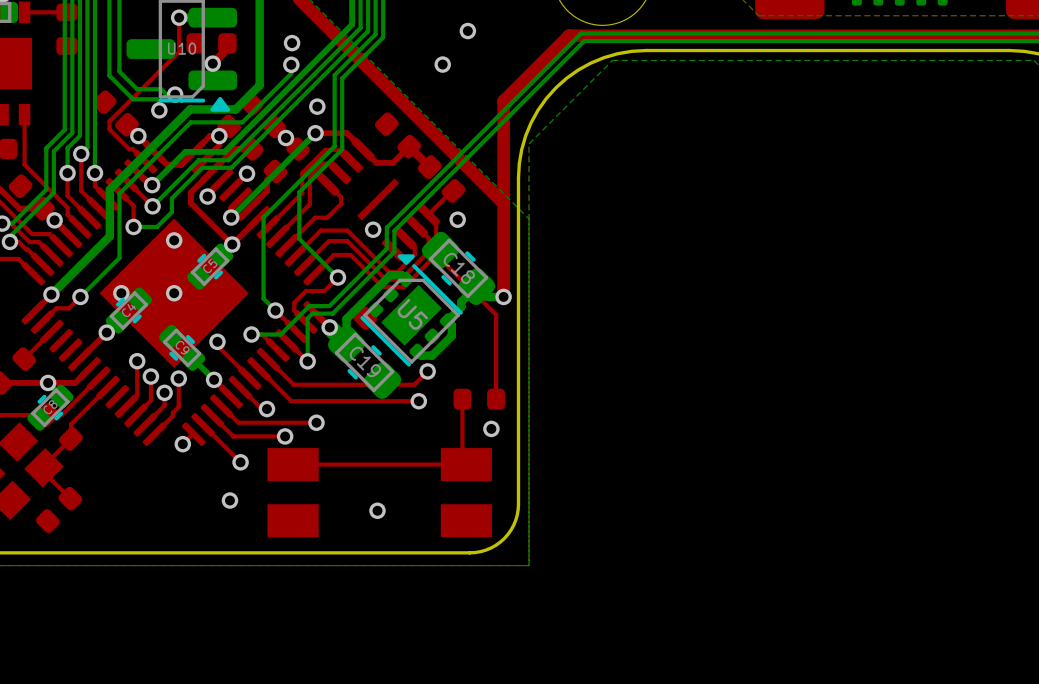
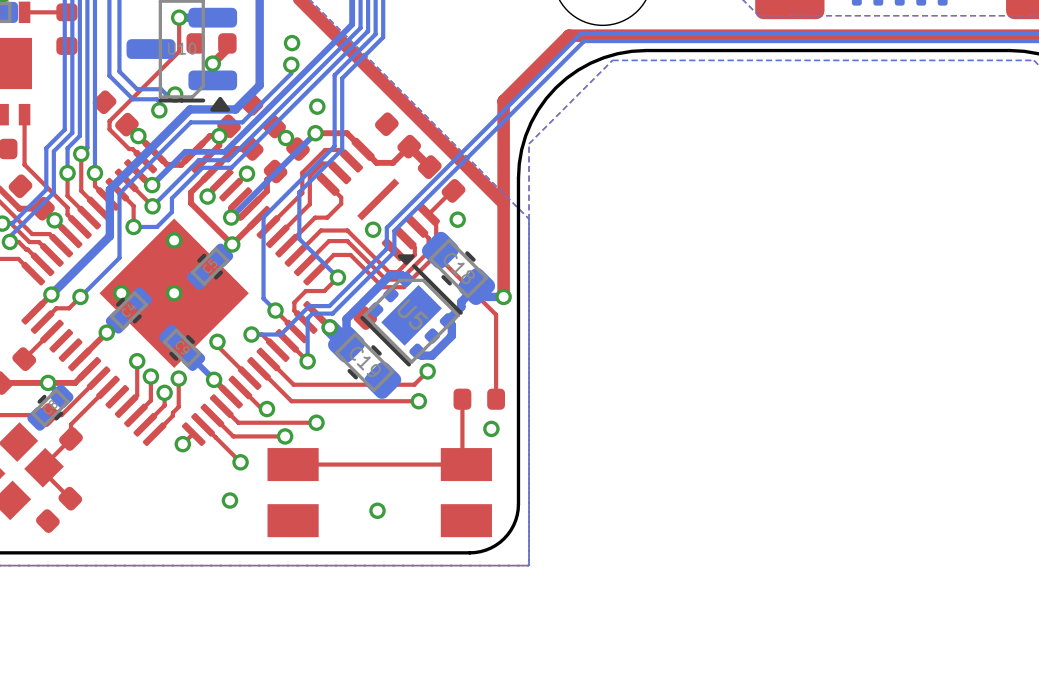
via: (467, 31) -> none
via: (442, 64) -> none

